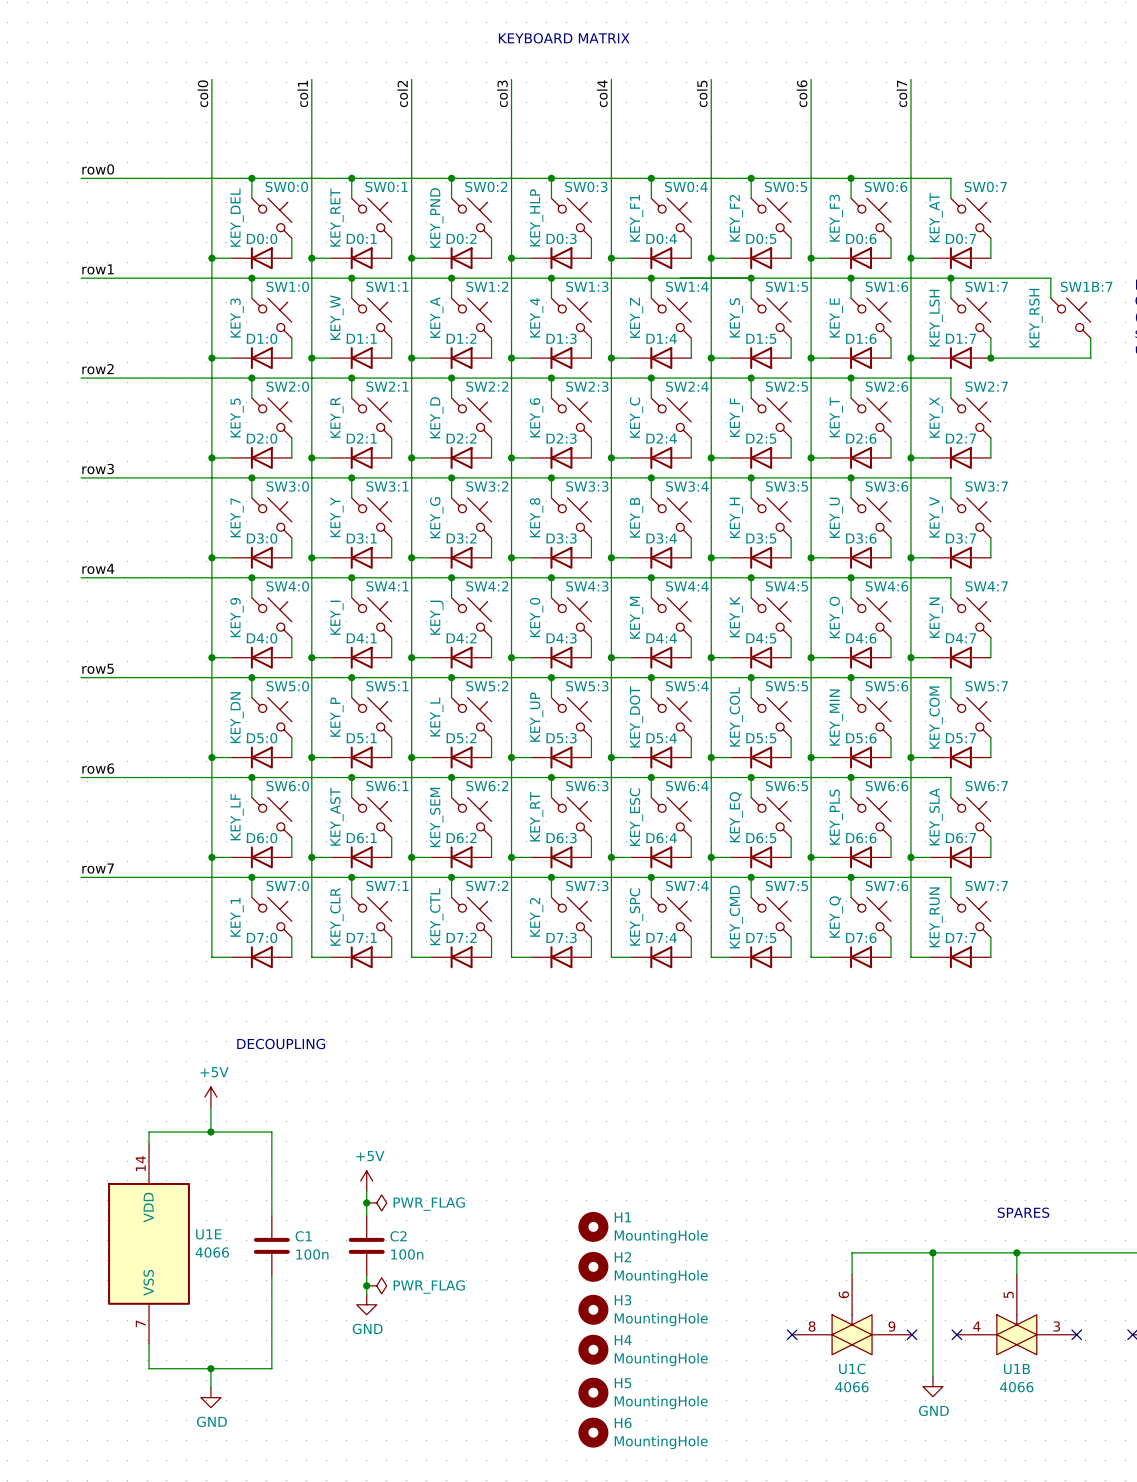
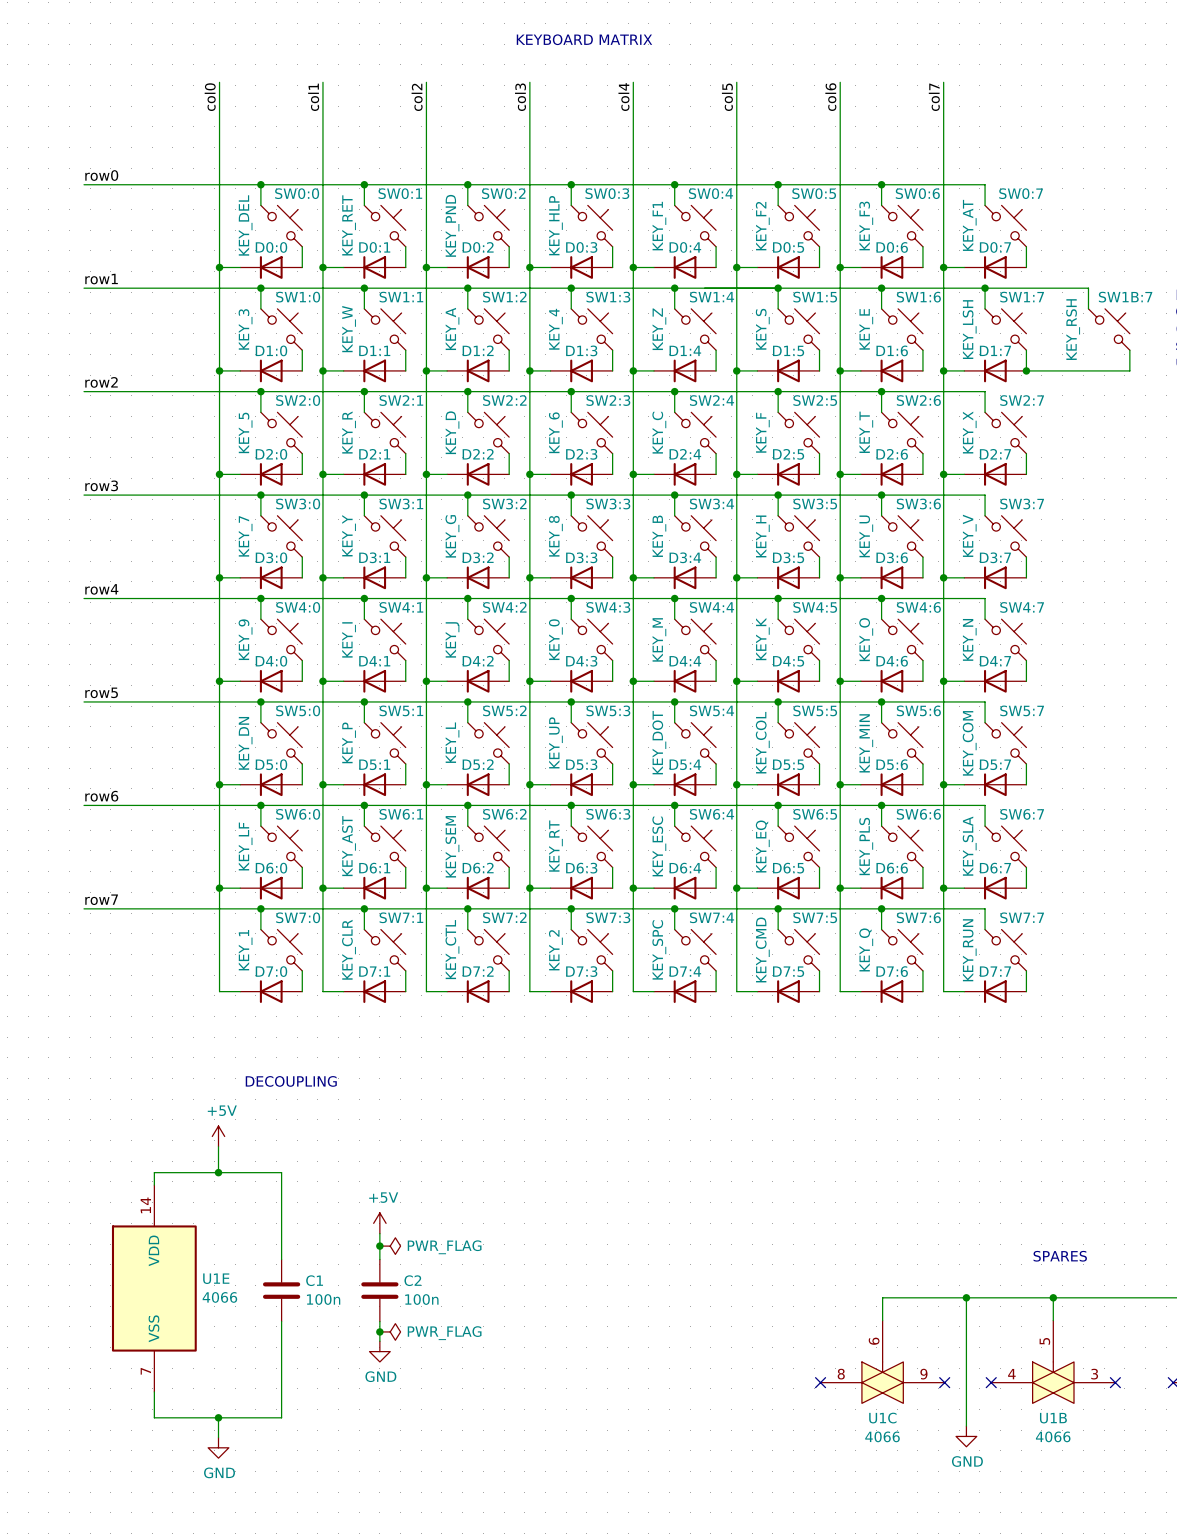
H1: MountingHole (593, 1226) -> none
H2: MountingHole (593, 1266) -> none
H3: MountingHole (593, 1309) -> none
H4: MountingHole (593, 1349) -> none
H5: MountingHole (593, 1392) -> none
H6: MountingHole (593, 1432) -> none

